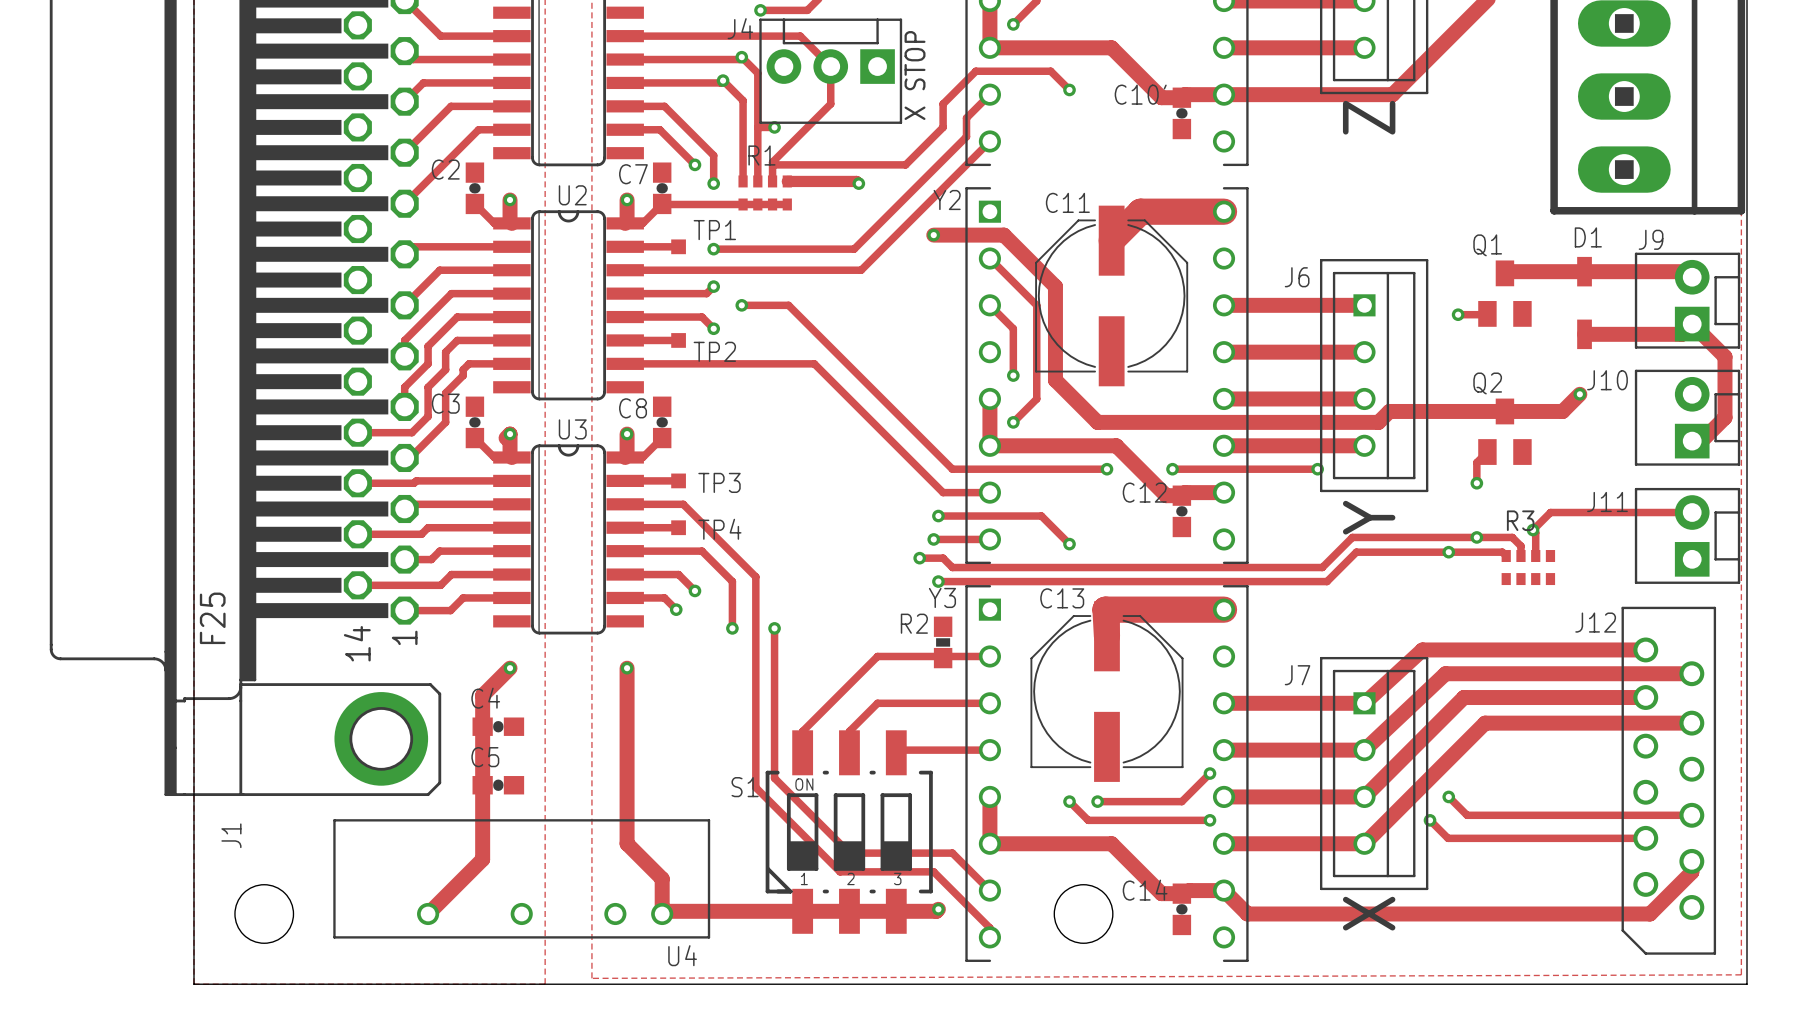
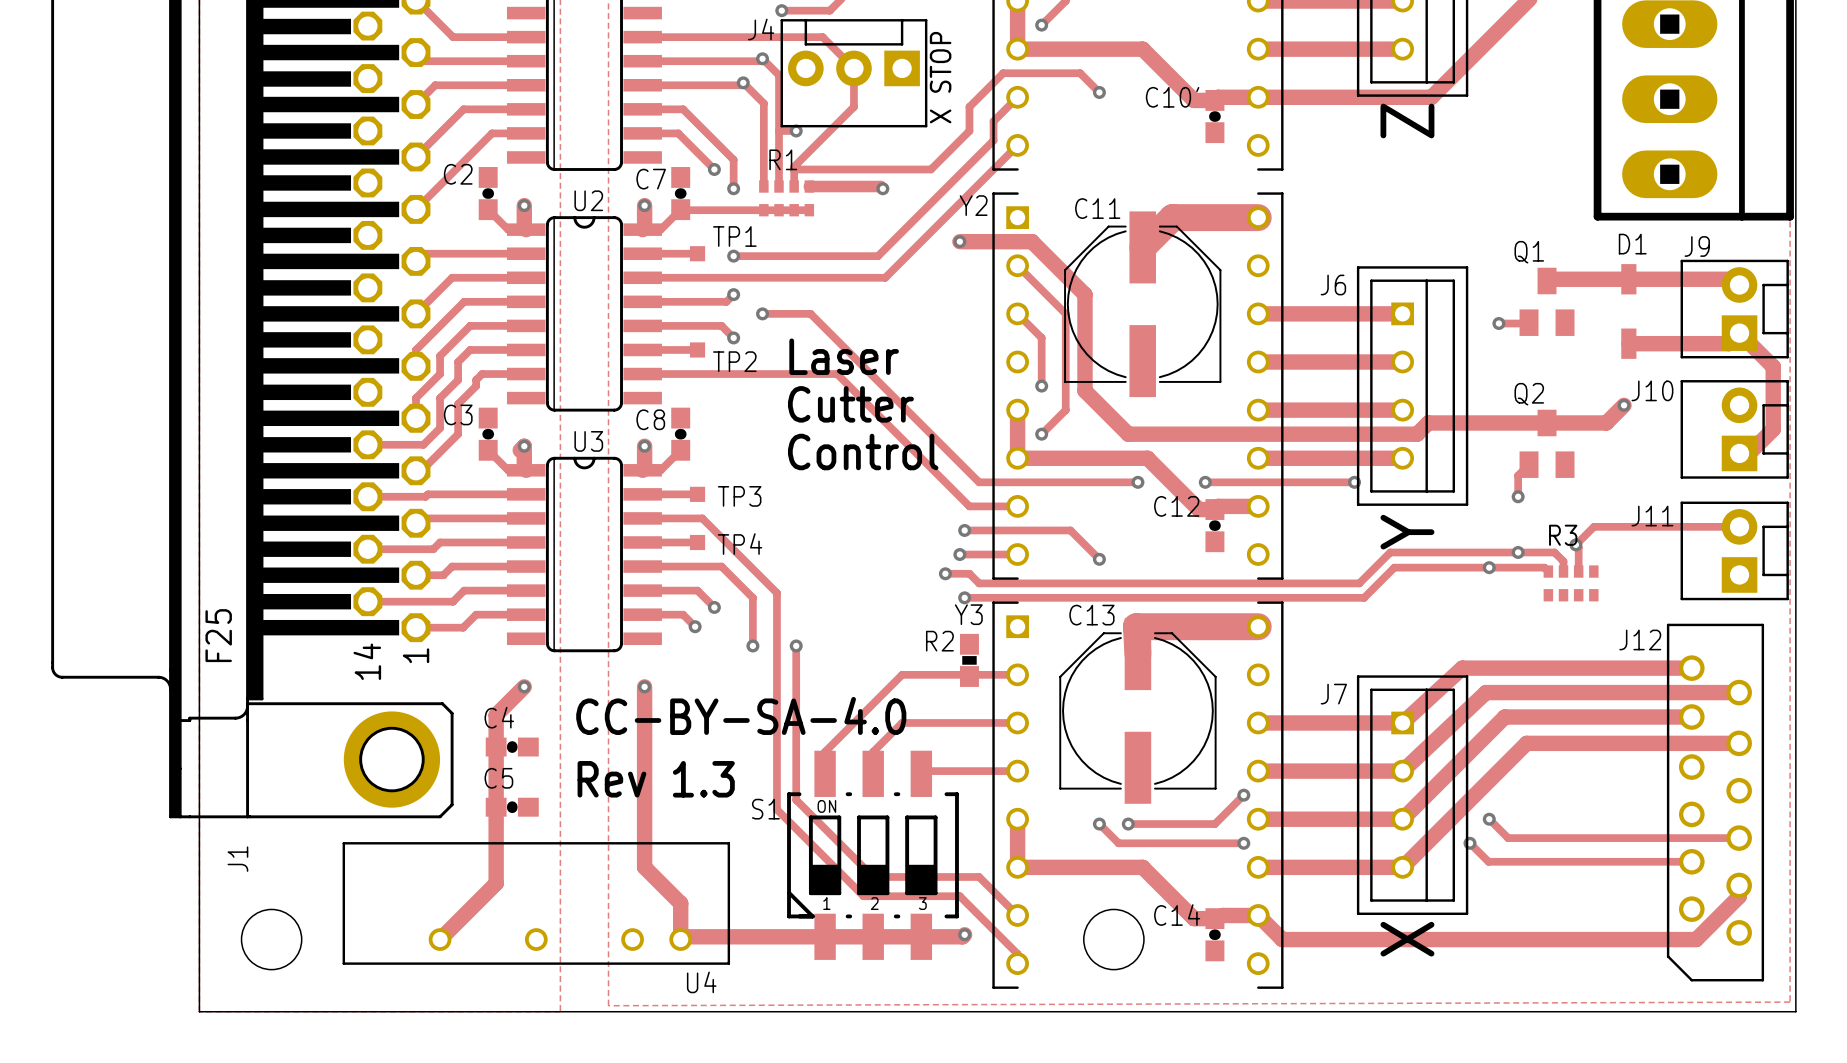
text: none -> Laser (844, 356)
text: none -> Cutter (850, 404)
text: none -> Control (863, 452)
text: none -> CC-BY-SA-4.0 (741, 715)
text: none -> Rev 1.3 (656, 779)

